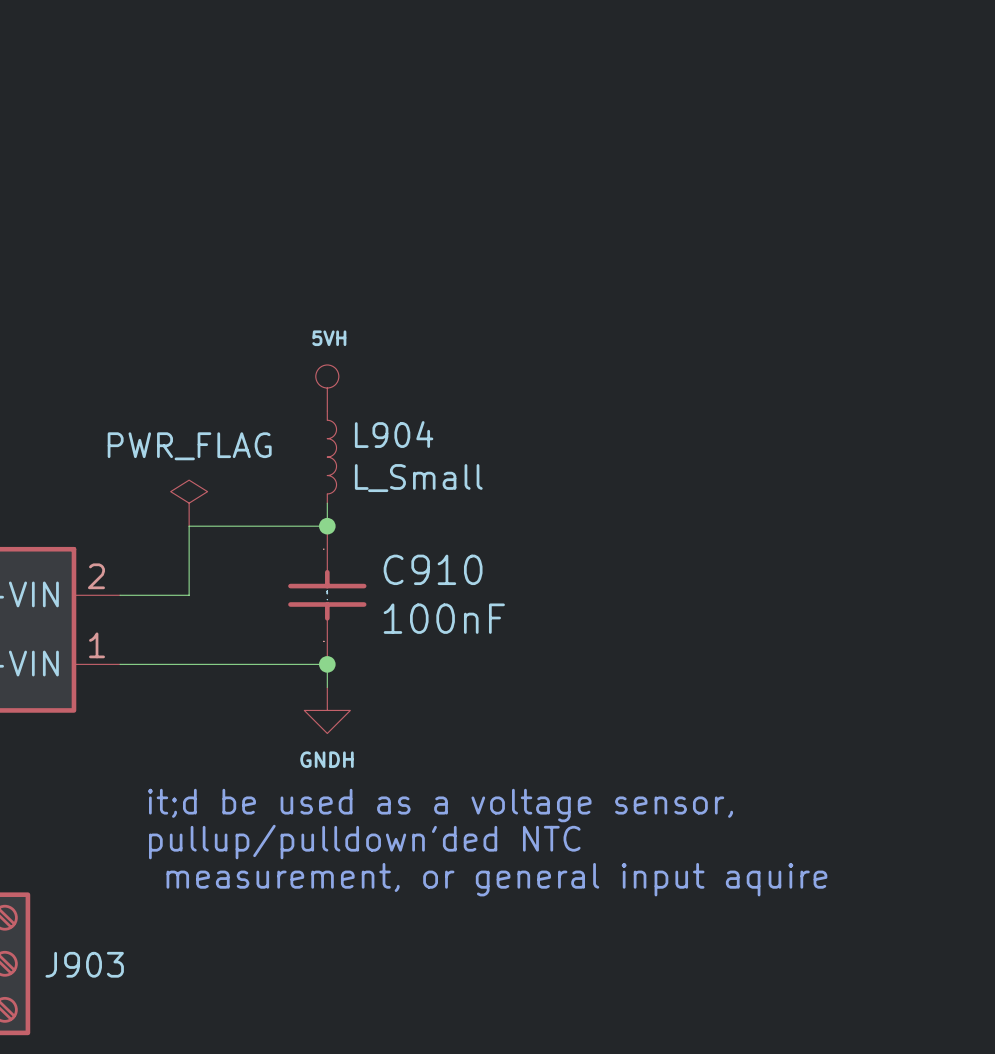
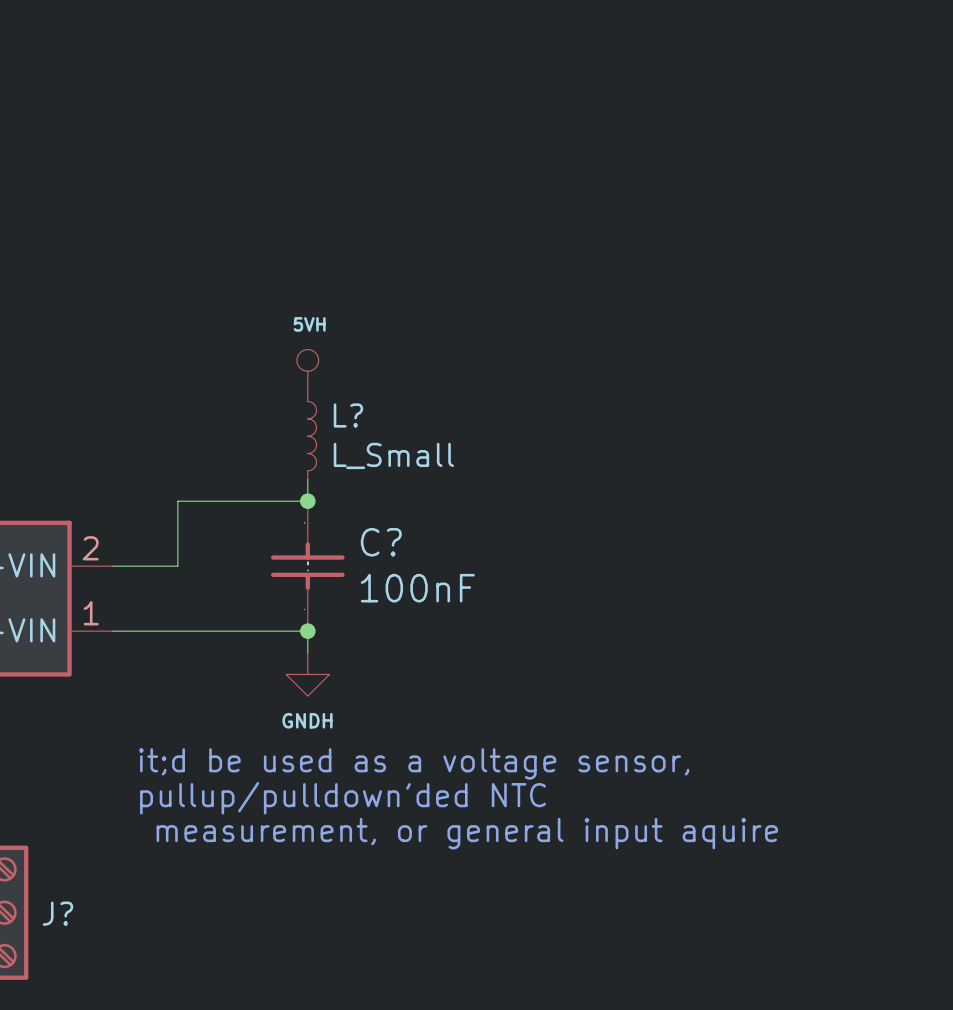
L904 name: L904 (394, 434) -> L? (348, 415)
power symbol: PWR_FLAG (189, 503) -> none
C910 name: C910 (433, 569) -> C? (381, 542)
J903 name: J903 (84, 964) -> J? (57, 913)

